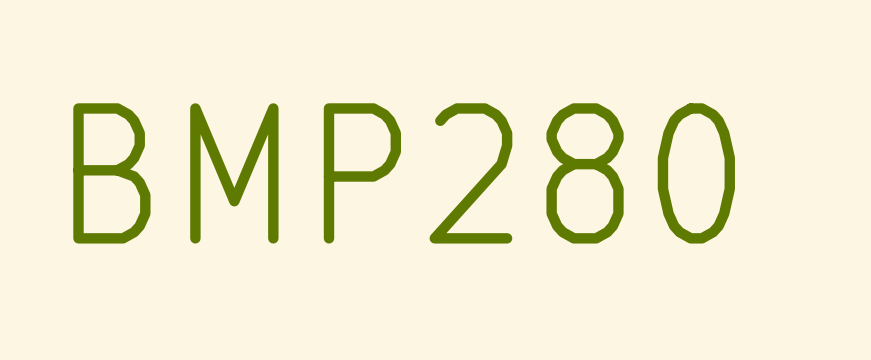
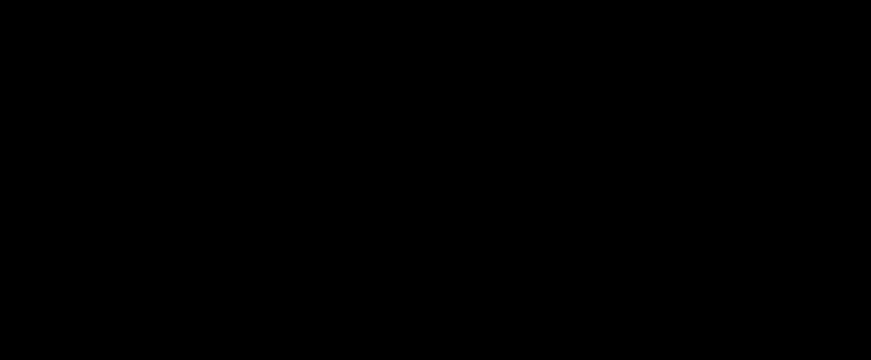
text: BMP280 (404, 173) -> none

